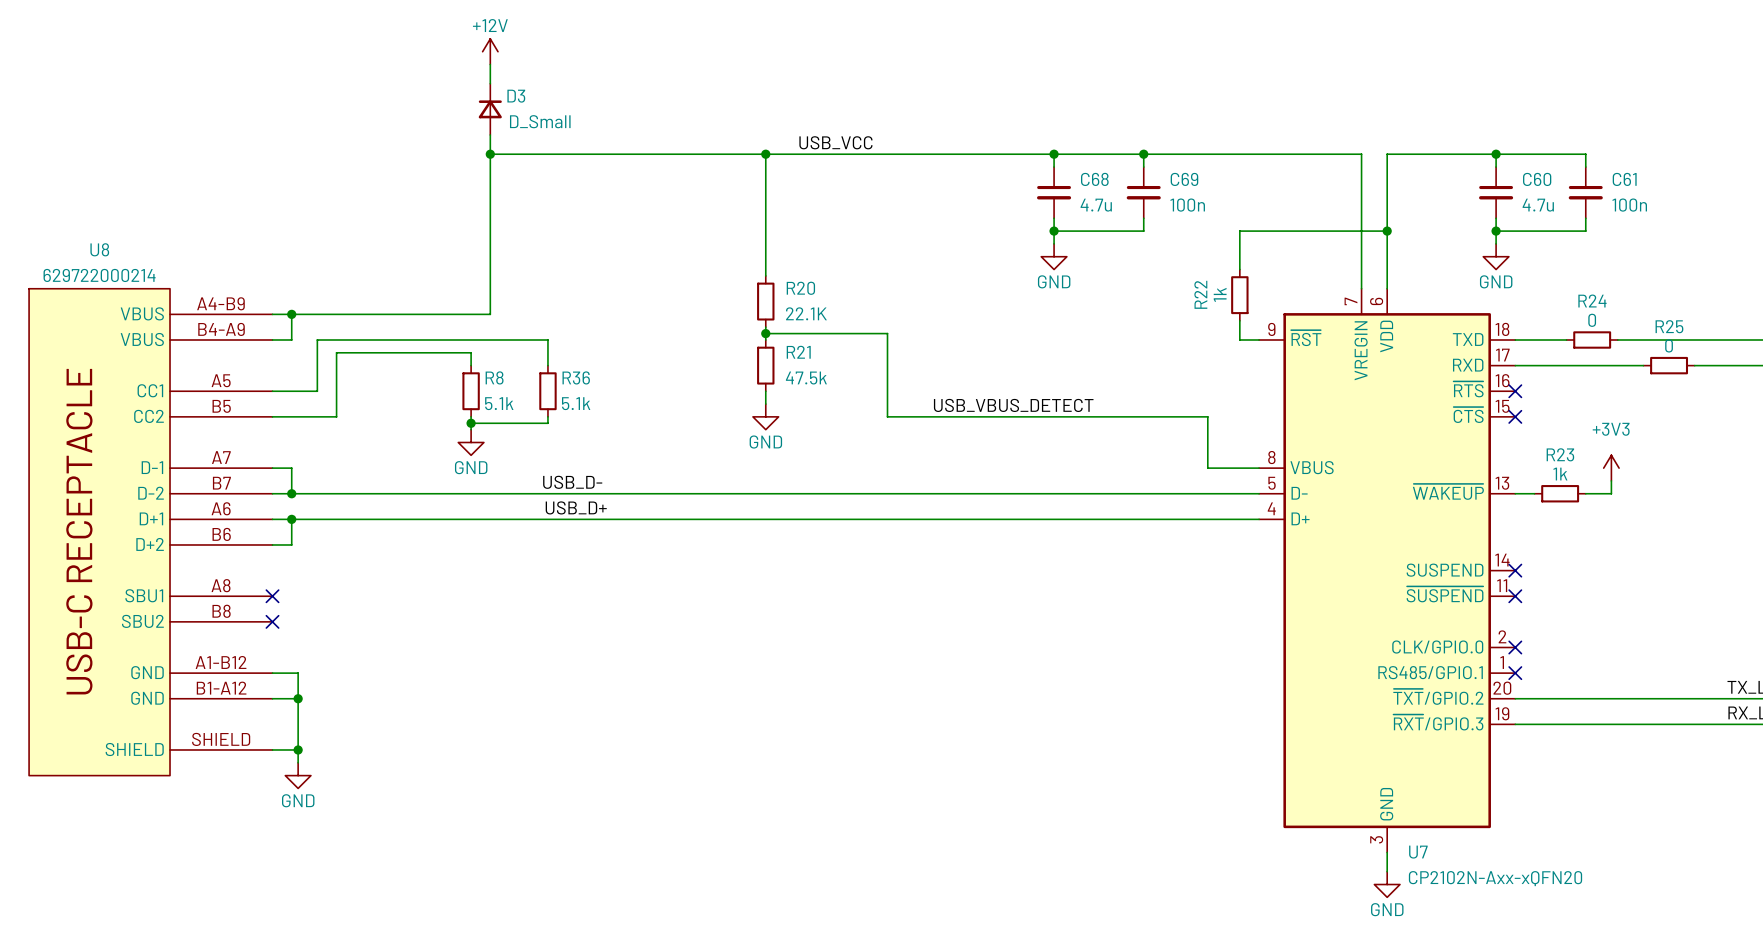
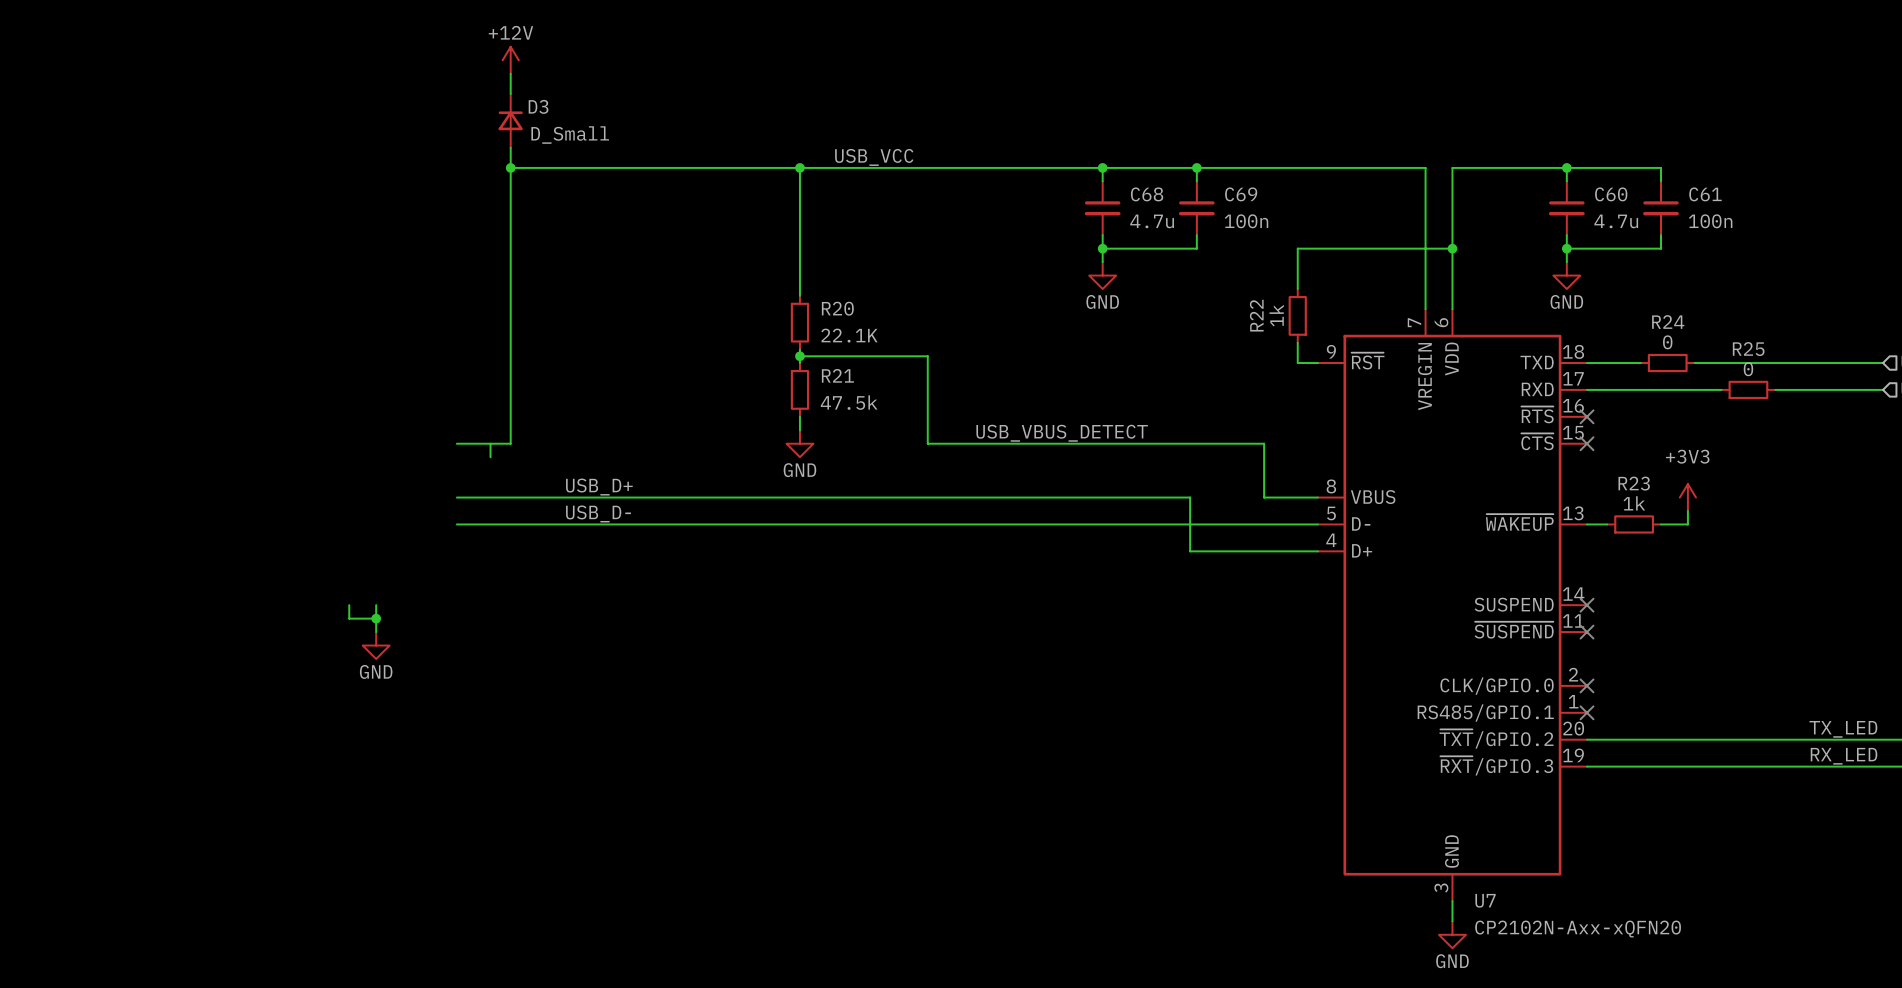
wire: (272, 314) (490, 314) -> (456, 443) (510, 443) (510, 336)
wire: (291, 314) (291, 339) (272, 339) -> none
junction: (291, 314) -> none
wire: (471, 365) (471, 352) (336, 352) (336, 416) (272, 416) -> none
wire: (547, 365) (547, 339) (317, 339) (317, 391) (272, 391) -> none
R8: 5.1k (471, 391) -> none
R36: 5.1k (547, 391) -> none
wire: (547, 416) (547, 423) (471, 423) -> none
junction: (471, 423) -> none
power symbol: GND (471, 442) -> none
wire: (272, 468) (291, 468) (291, 493) -> none
wire: (272, 493) (439, 493) -> none
junction: (291, 493) -> none
label position: USB_D+ (576, 507) -> USB_D+ (599, 487)
wire: (272, 519) (1137, 519) -> (456, 497) (1190, 497) (1190, 551)
wire: (291, 519) (291, 544) (272, 544) -> none
junction: (291, 519) -> none
U8: 629722000214 (150, 532) -> none
wire: none -> (349, 605) (349, 618) (376, 618)
wire: none -> (376, 605) (376, 632)
junction: none -> (376, 618)
no-connect mark: (272, 596) -> none
power symbol: none -> GND (376, 645)
no-connect mark: (272, 621) -> none
wire: (272, 673) (298, 673) (298, 762) -> none
wire: (272, 698) (298, 698) -> none
junction: (298, 698) -> none
wire: (272, 749) (298, 749) -> none
junction: (298, 749) -> none
power symbol: GND (298, 775) -> none

